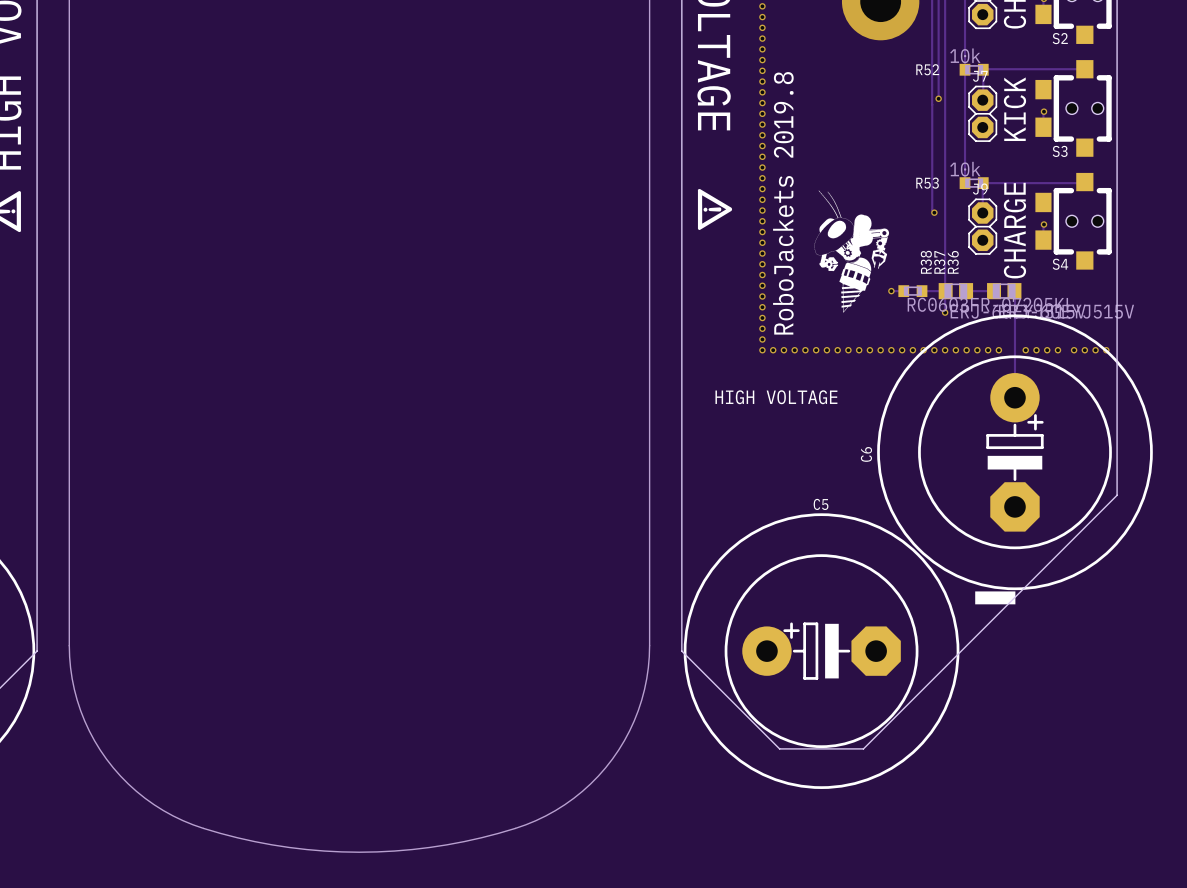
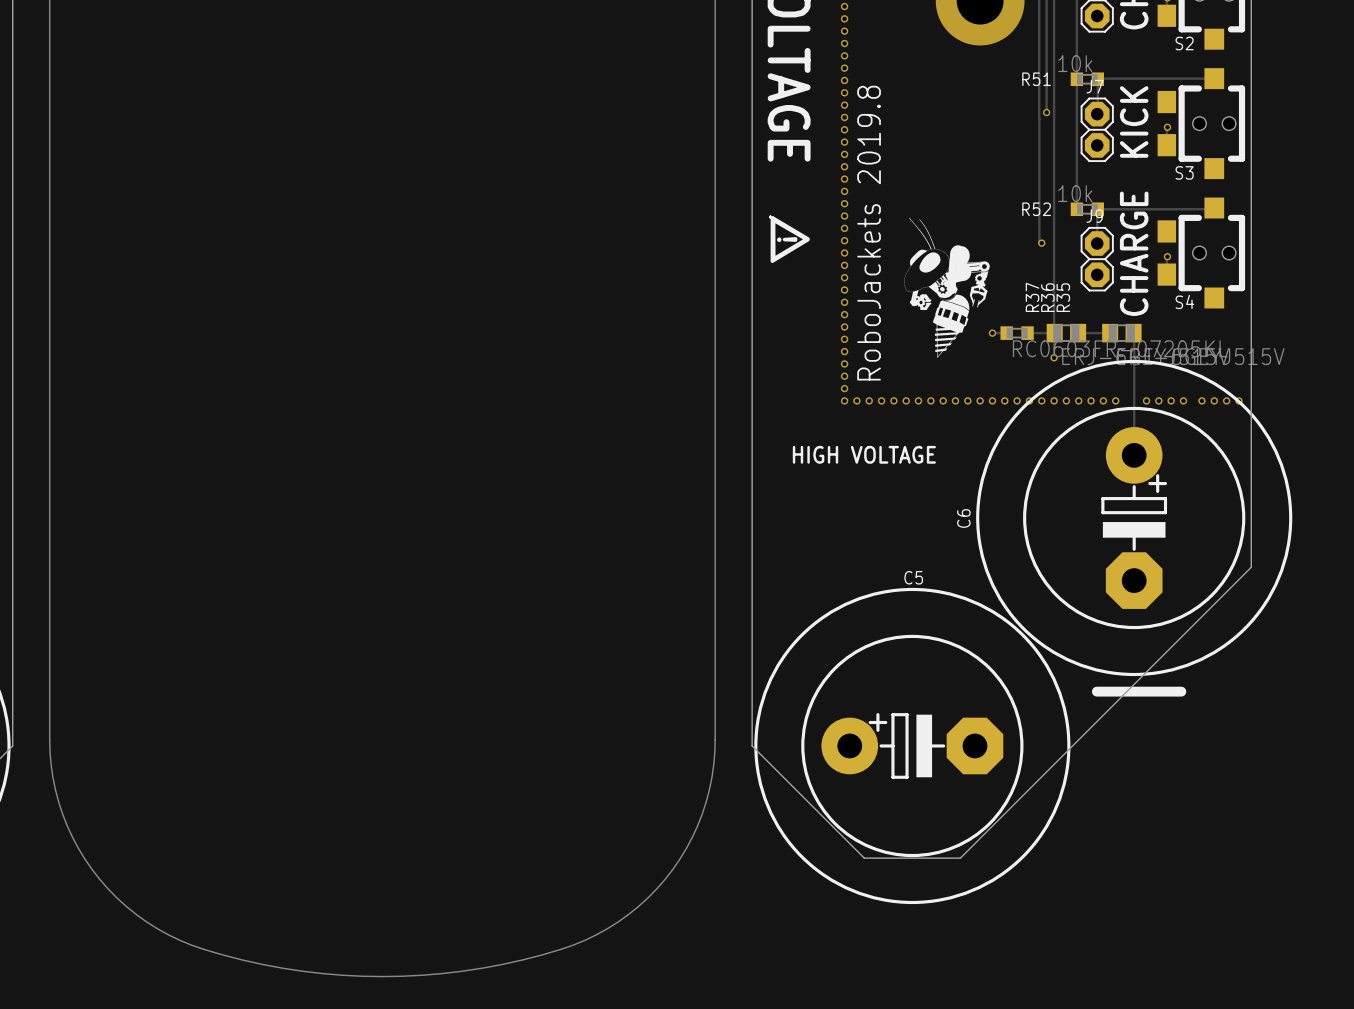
R52 name: R52 (927, 69) -> R51 (1036, 79)
R53 name: R53 (927, 183) -> R52 (1036, 209)
R38 name: R38 (926, 262) -> R37 (1032, 297)
R37 name: R37 (939, 262) -> R36 (1047, 297)
R36 name: R36 (953, 262) -> R35 (1063, 297)

